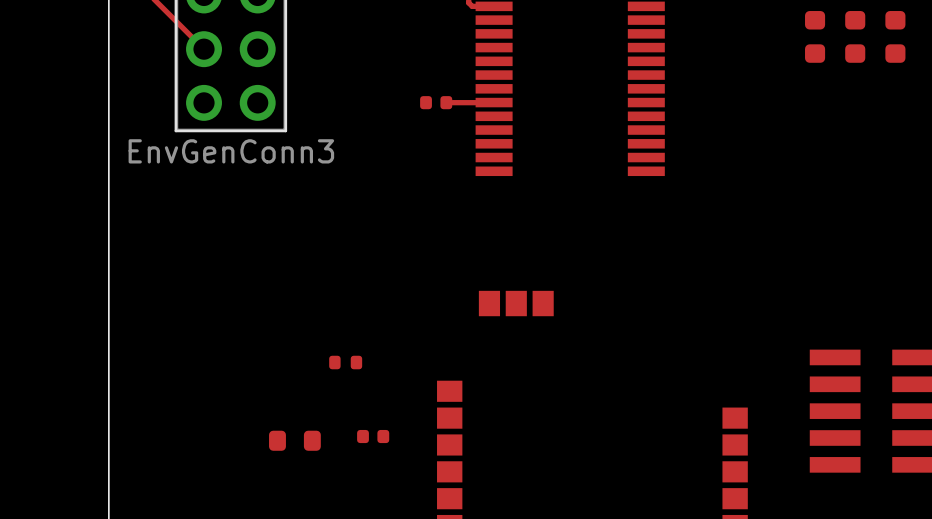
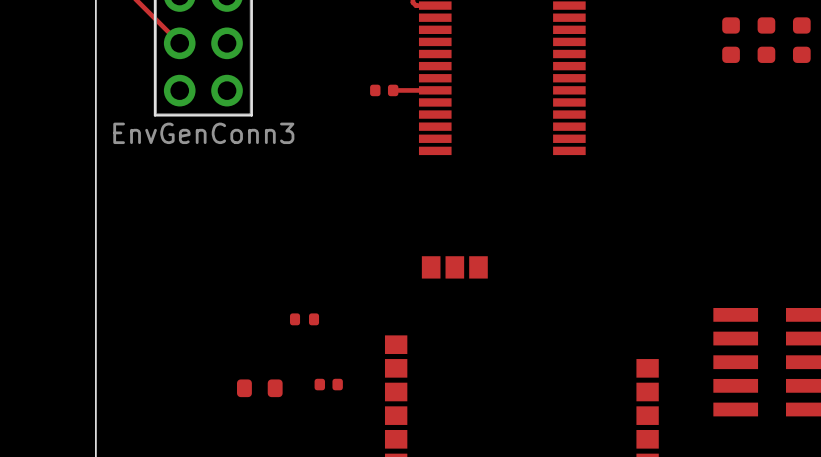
part: (815, 36) -> none
part: (855, 36) -> none
part: (895, 36) -> none
part: none -> (731, 40)
part: none -> (766, 40)
part: none -> (801, 40)

